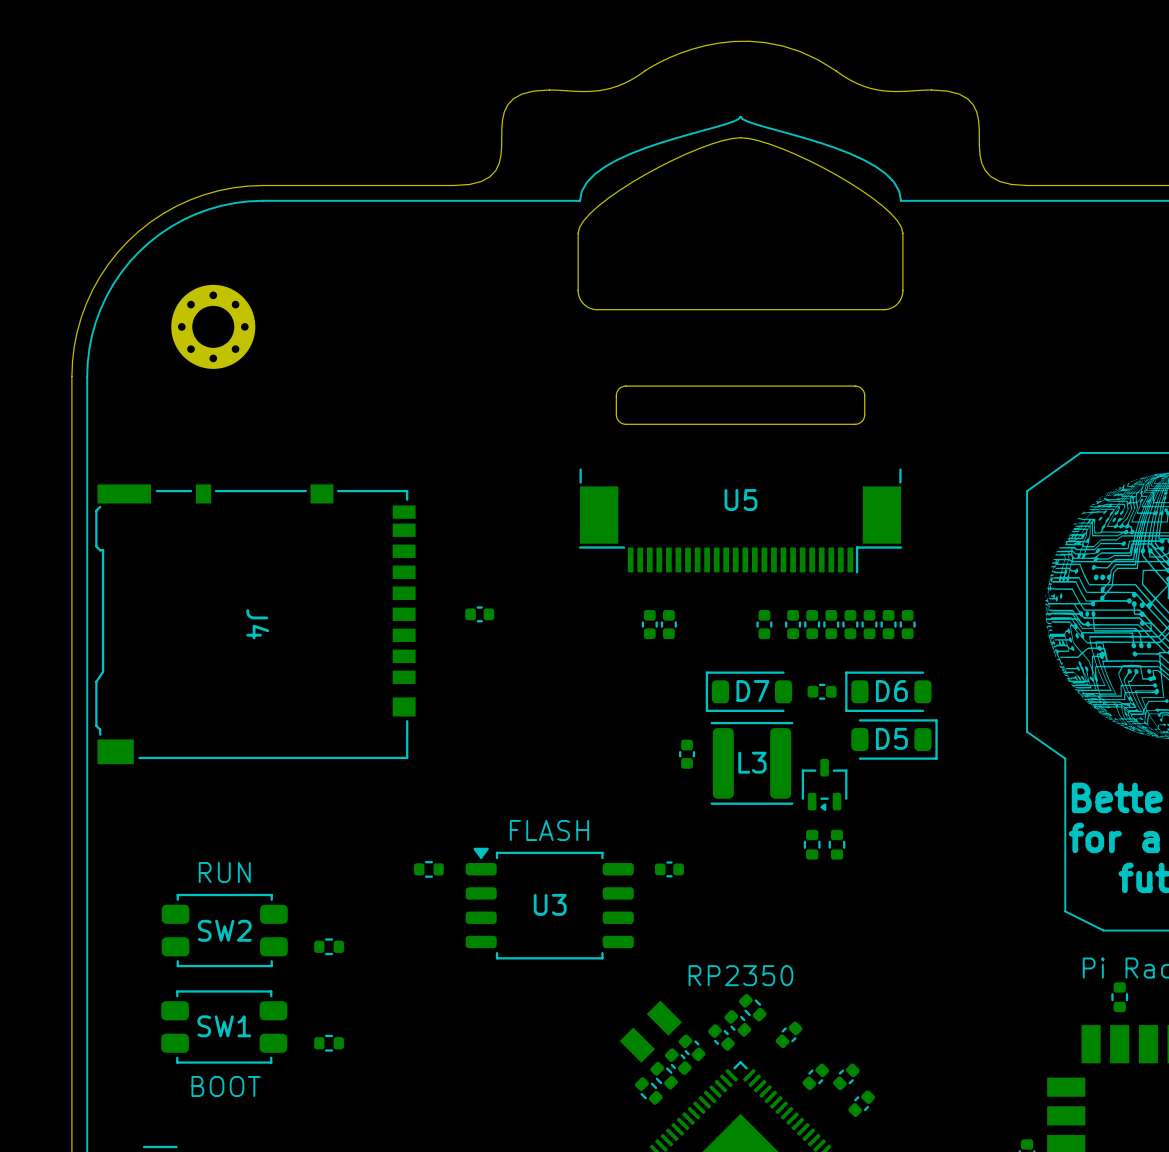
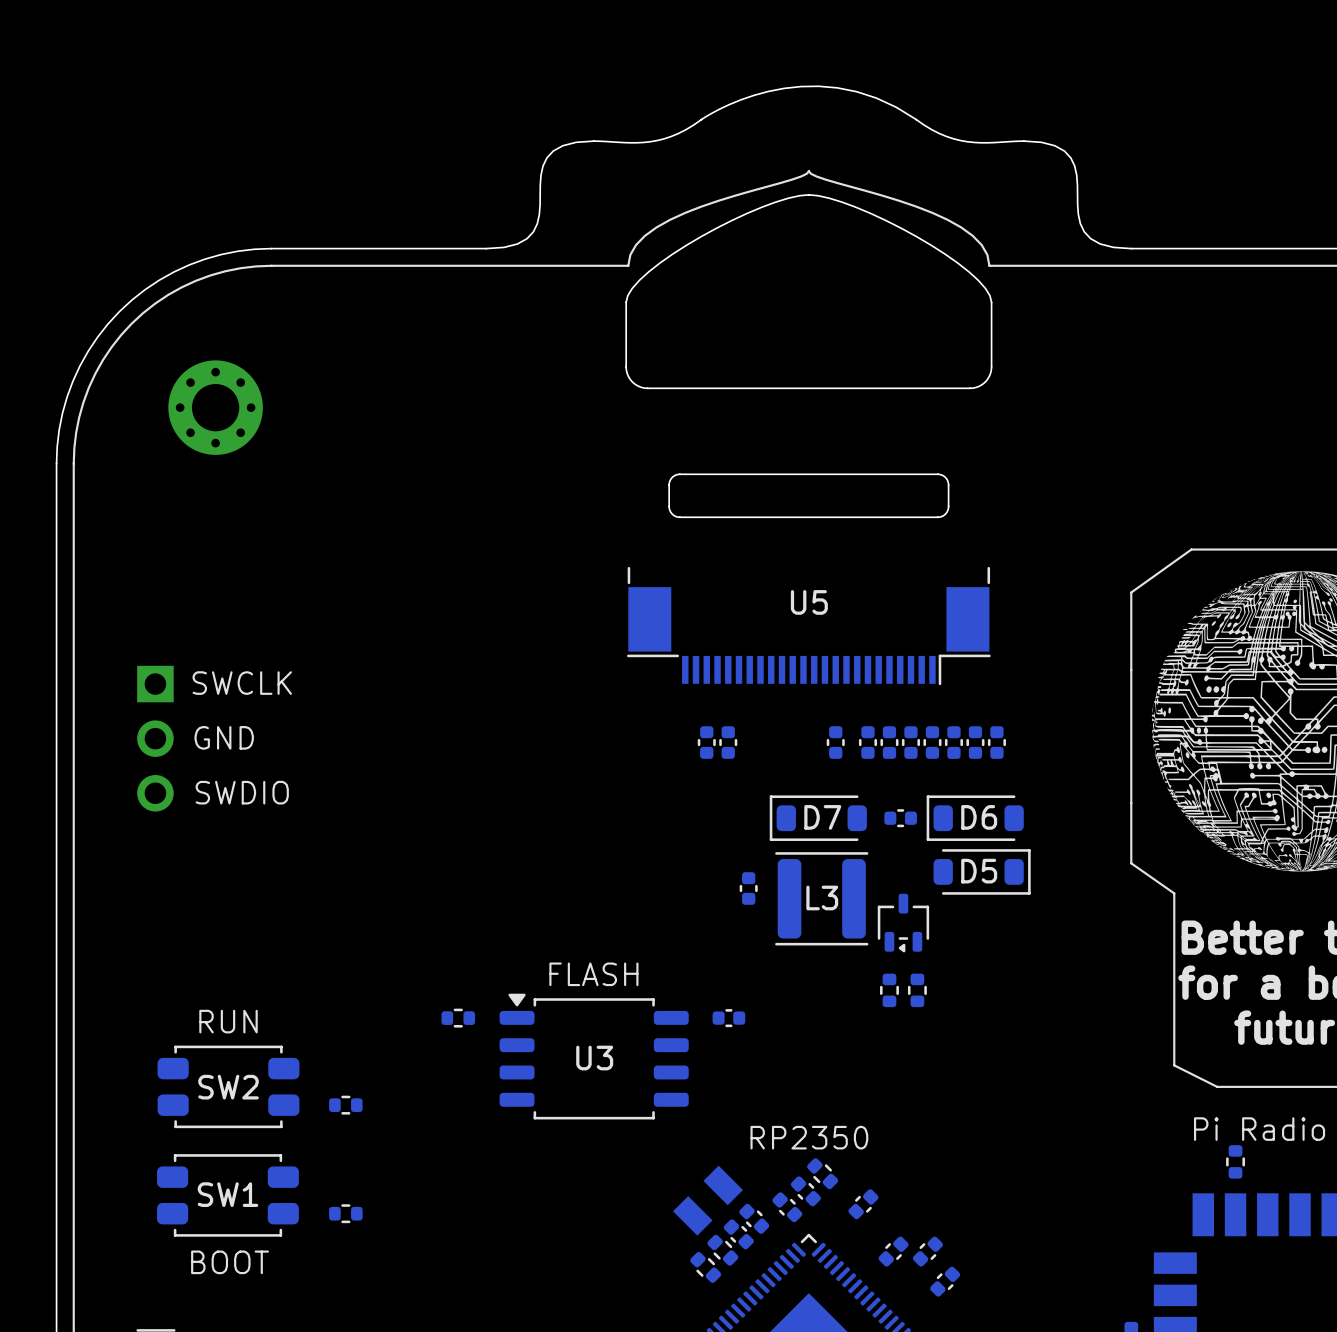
text: none -> SWCLK (242, 683)
part: (479, 614) -> none
text: none -> GND (224, 737)
part: none -> (155, 738)
J4: (255, 624) -> none
text: none -> SWDIO (242, 792)

